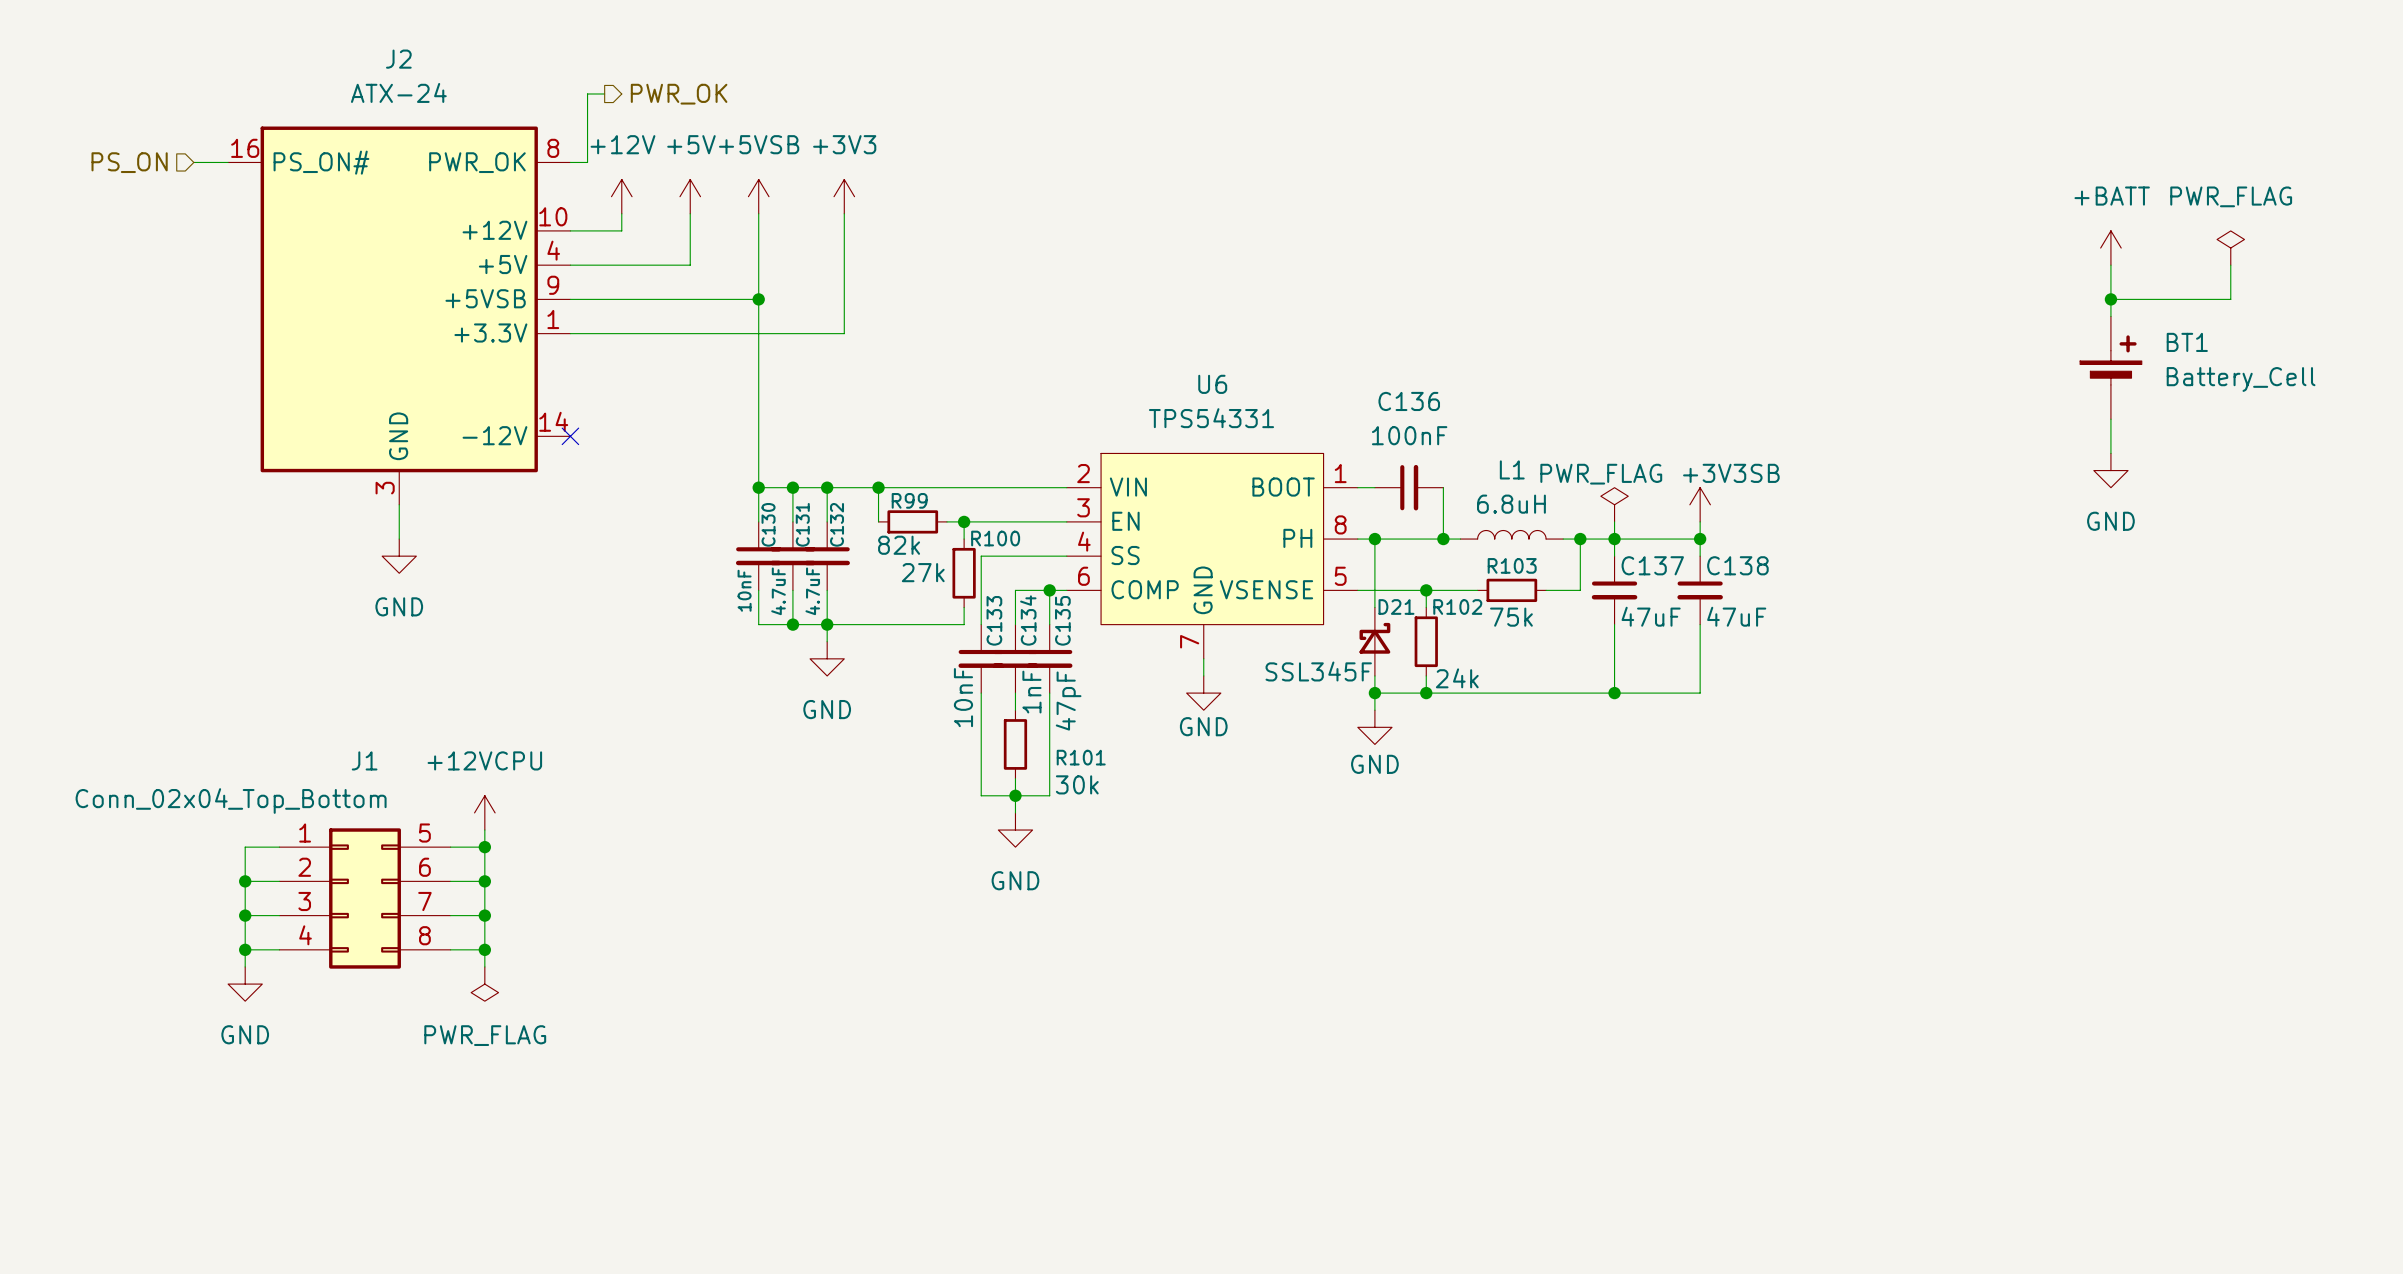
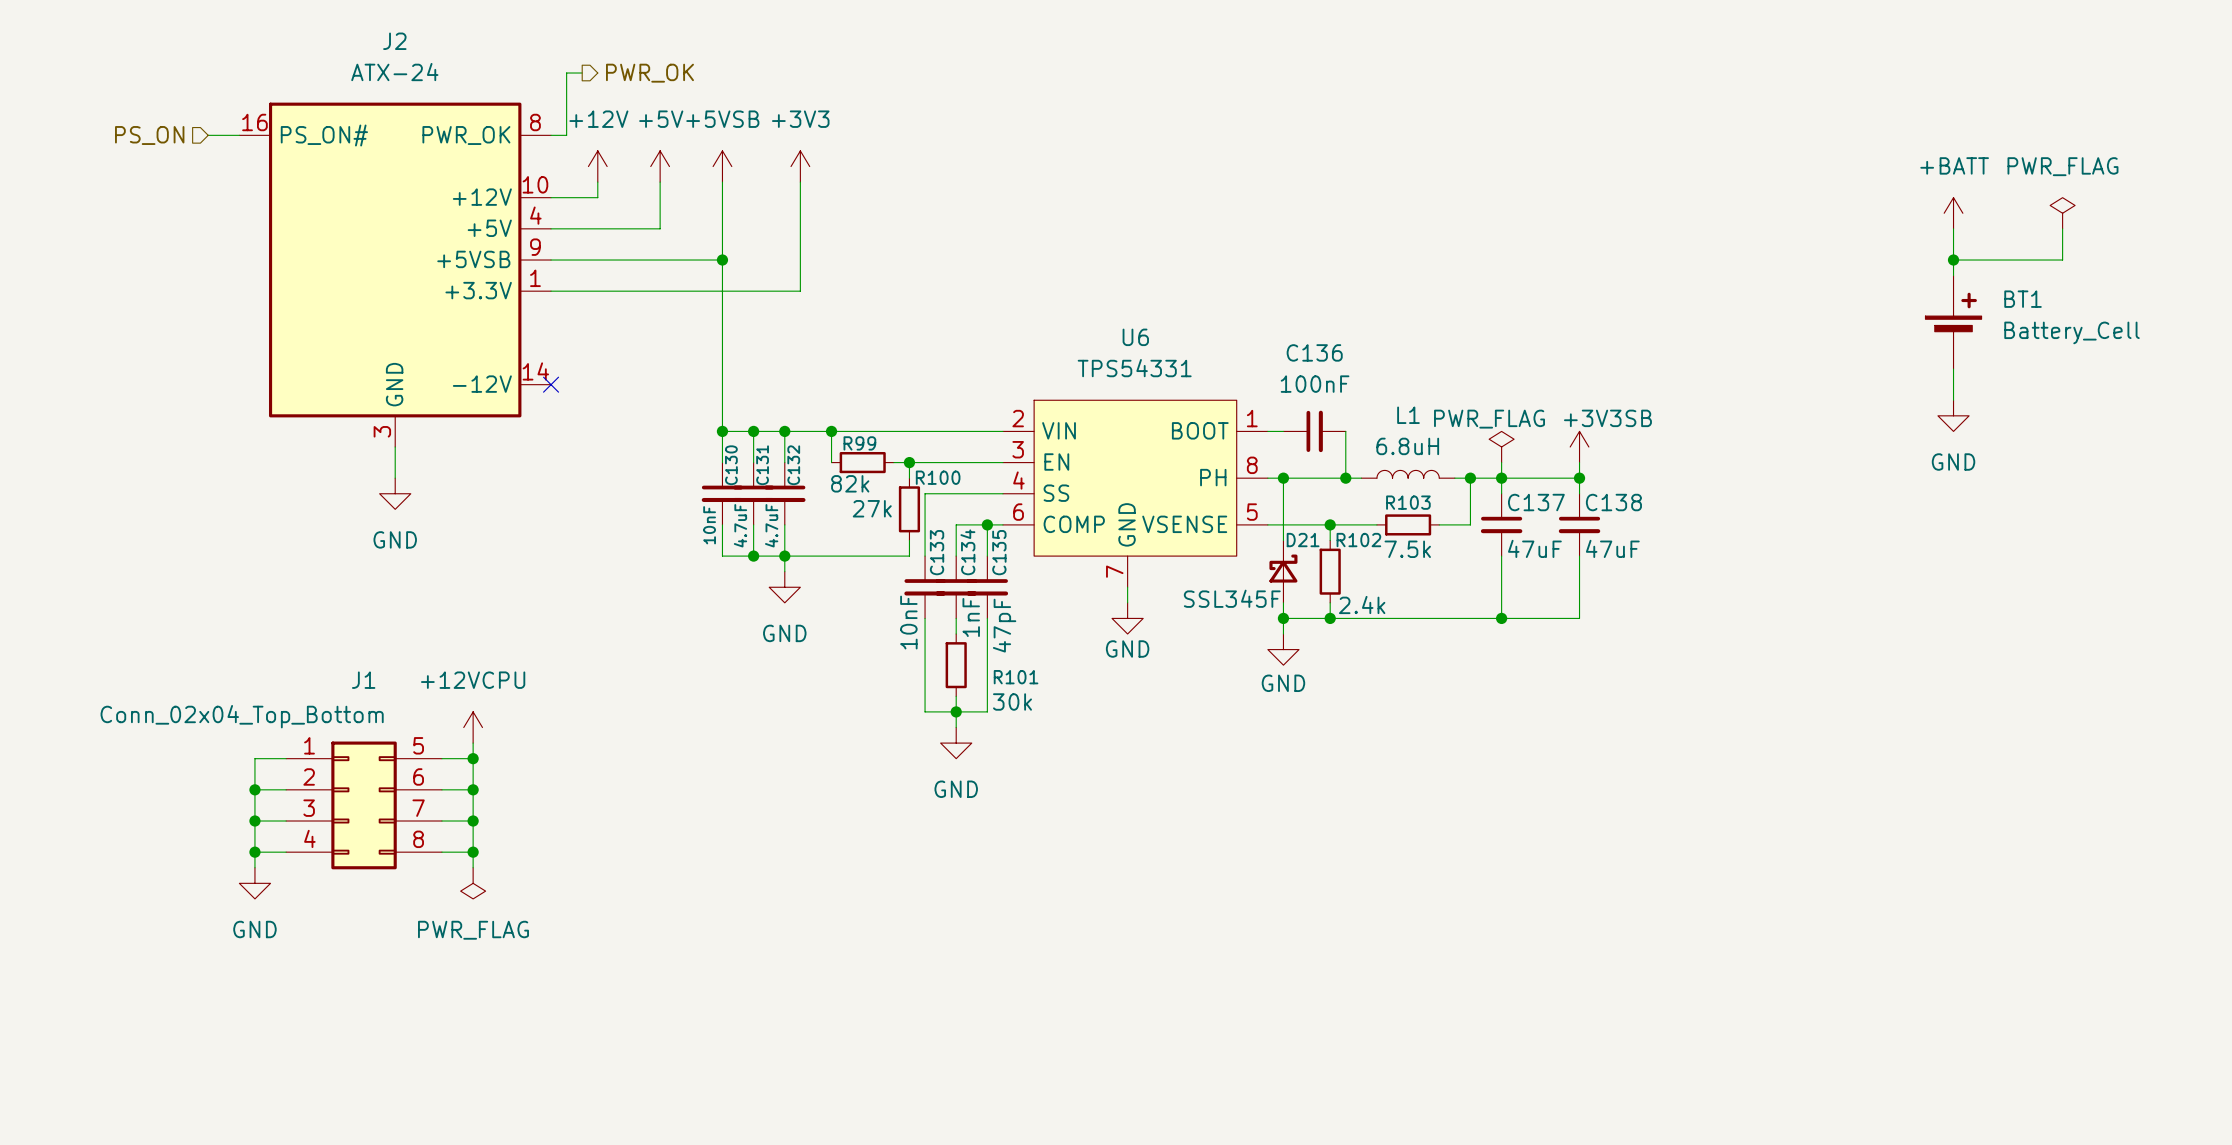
R103 value: 75k (1511, 617) -> 7.5k (1407, 549)
R102 value: 24k (1457, 678) -> 2.4k (1362, 605)

